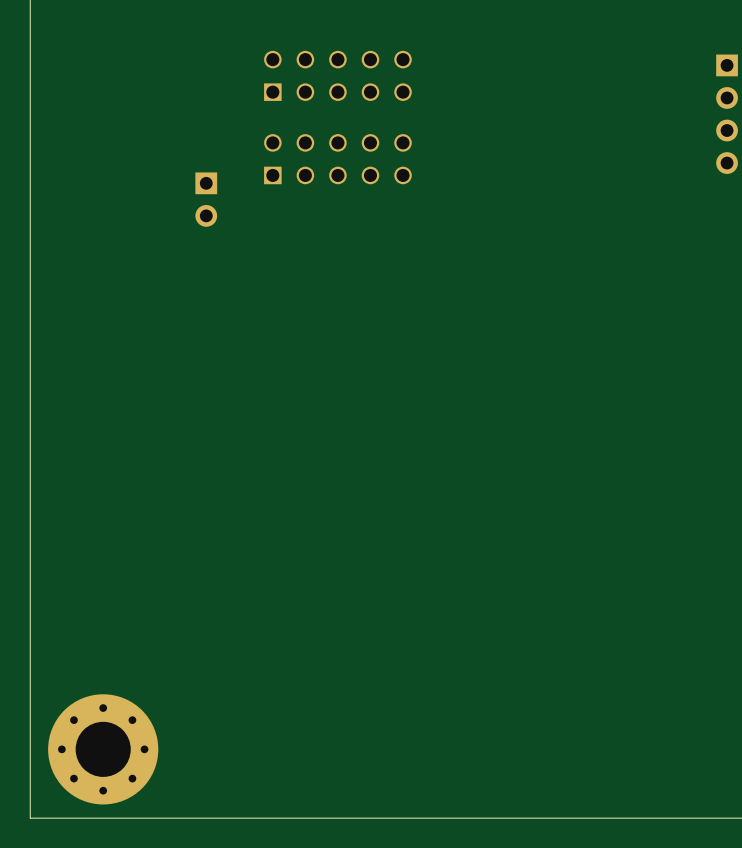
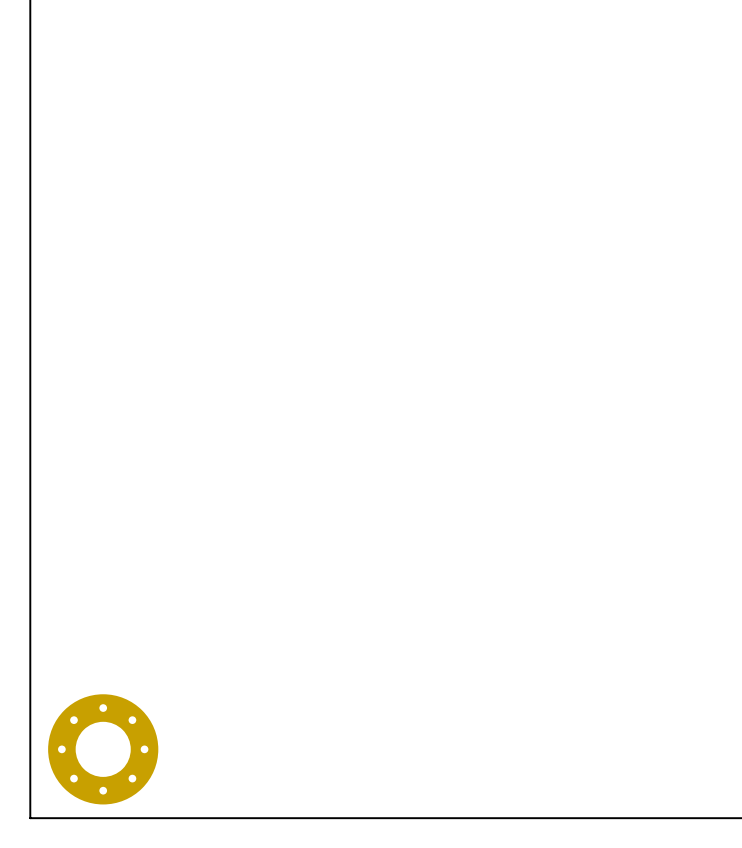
part: (337, 75) -> none
part: (727, 114) -> none
part: (337, 159) -> none
part: (206, 199) -> none

